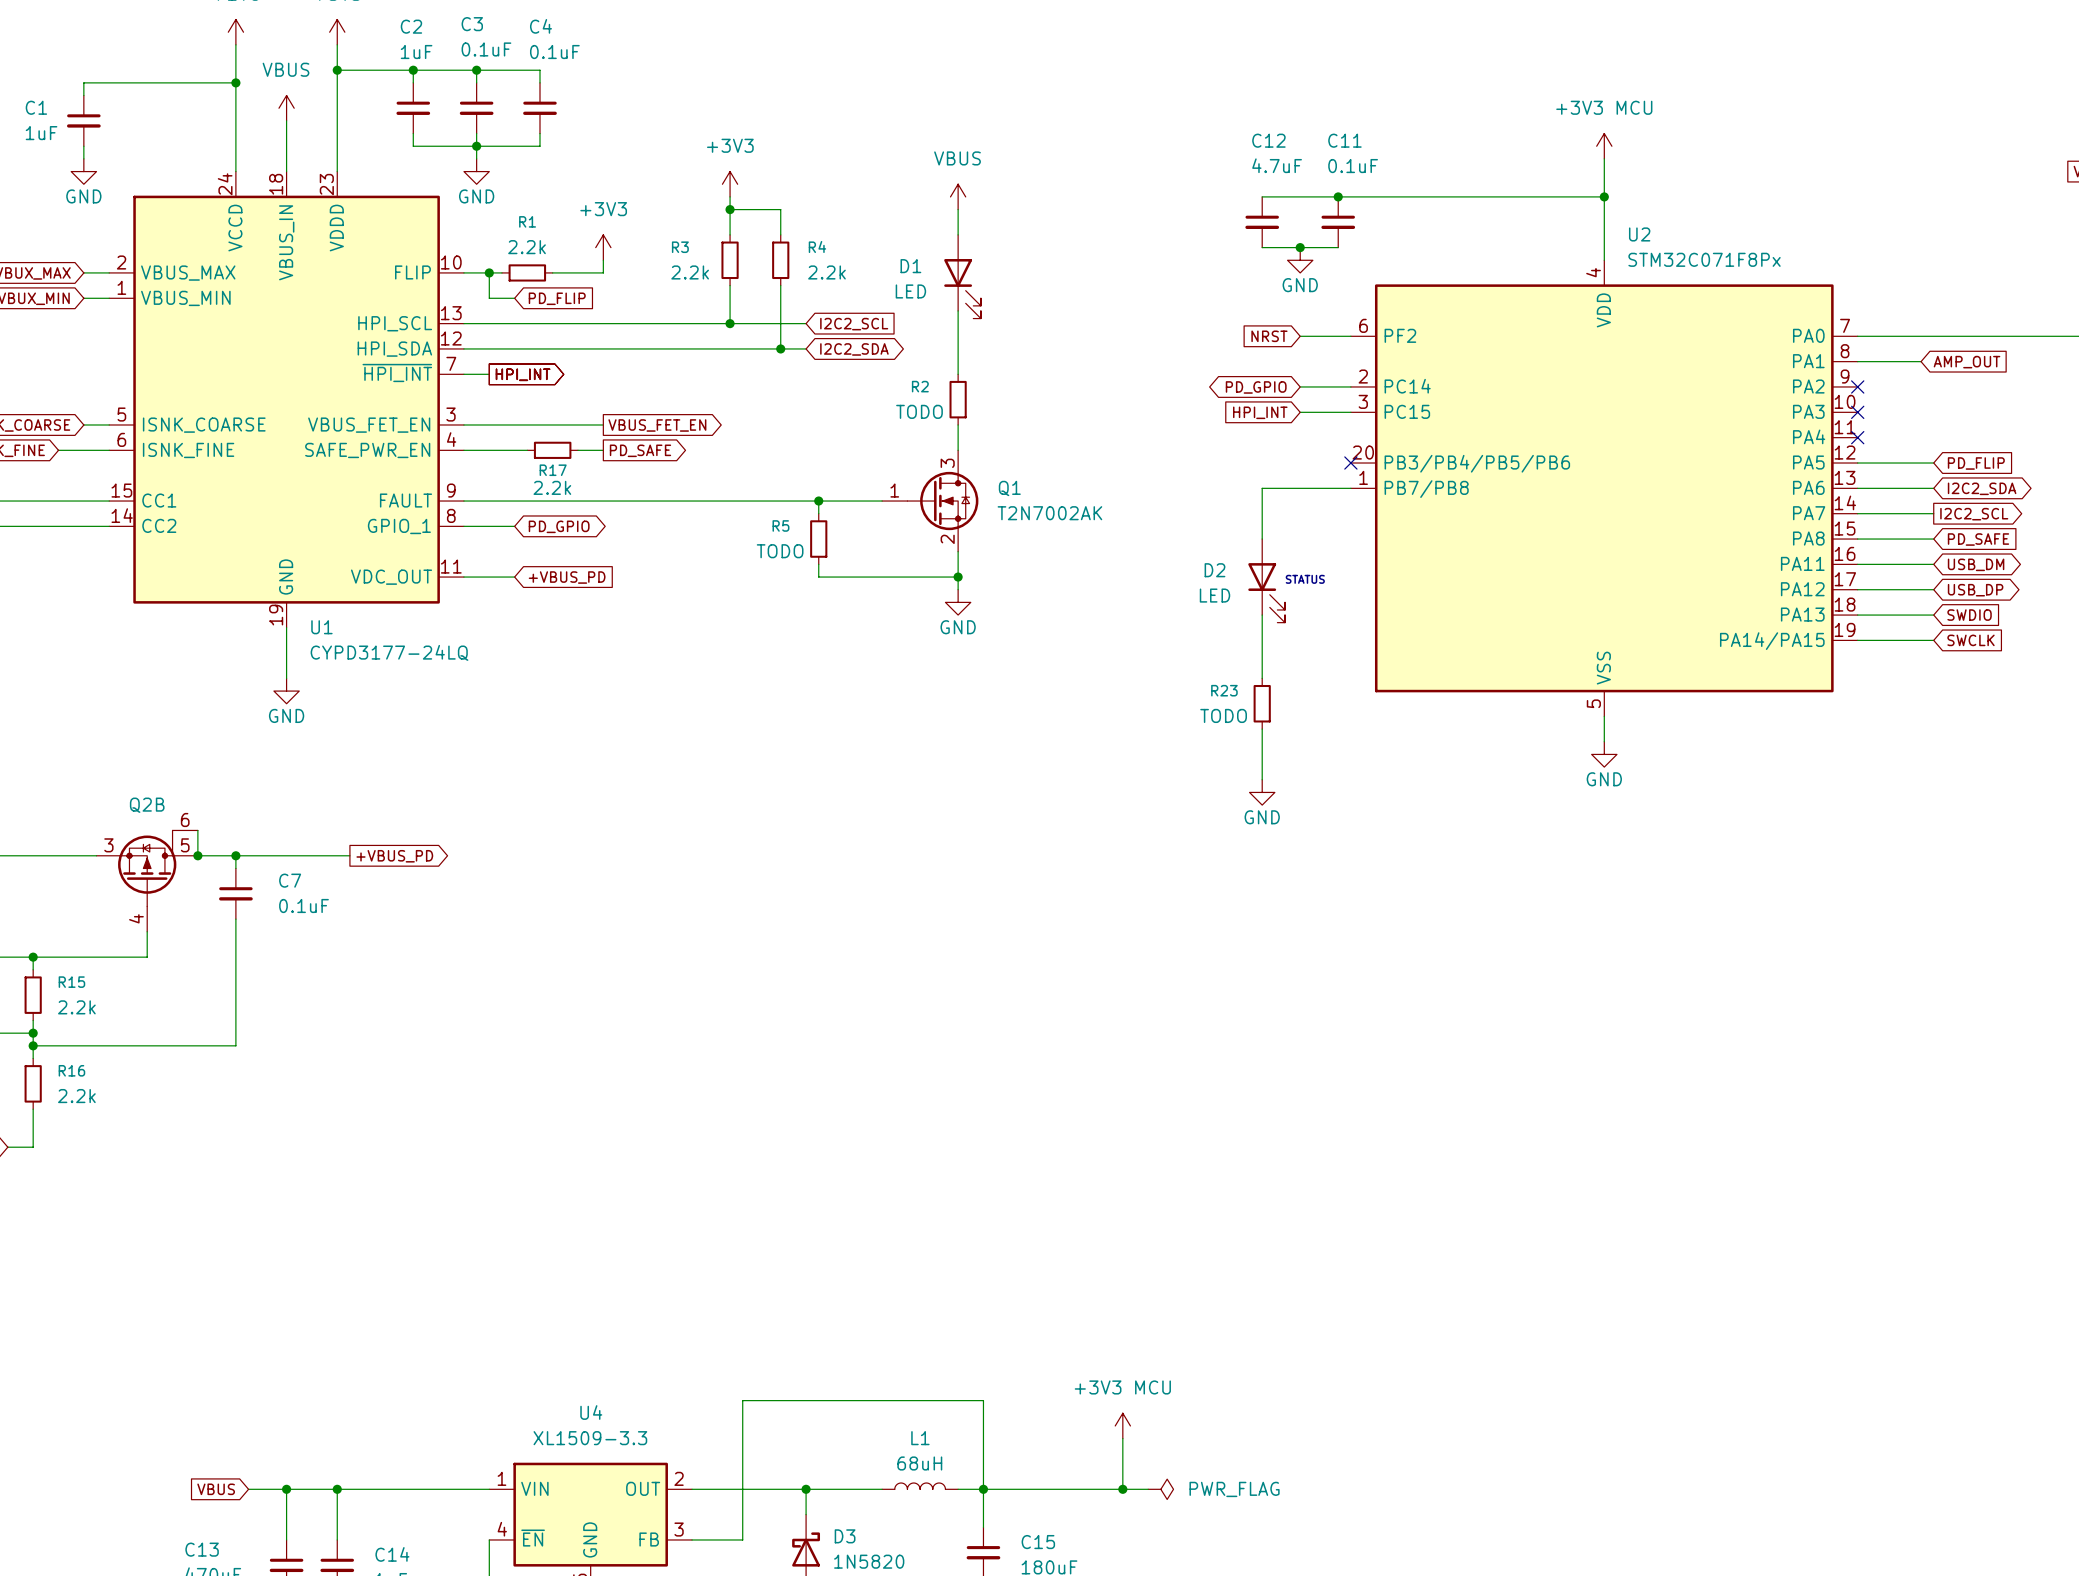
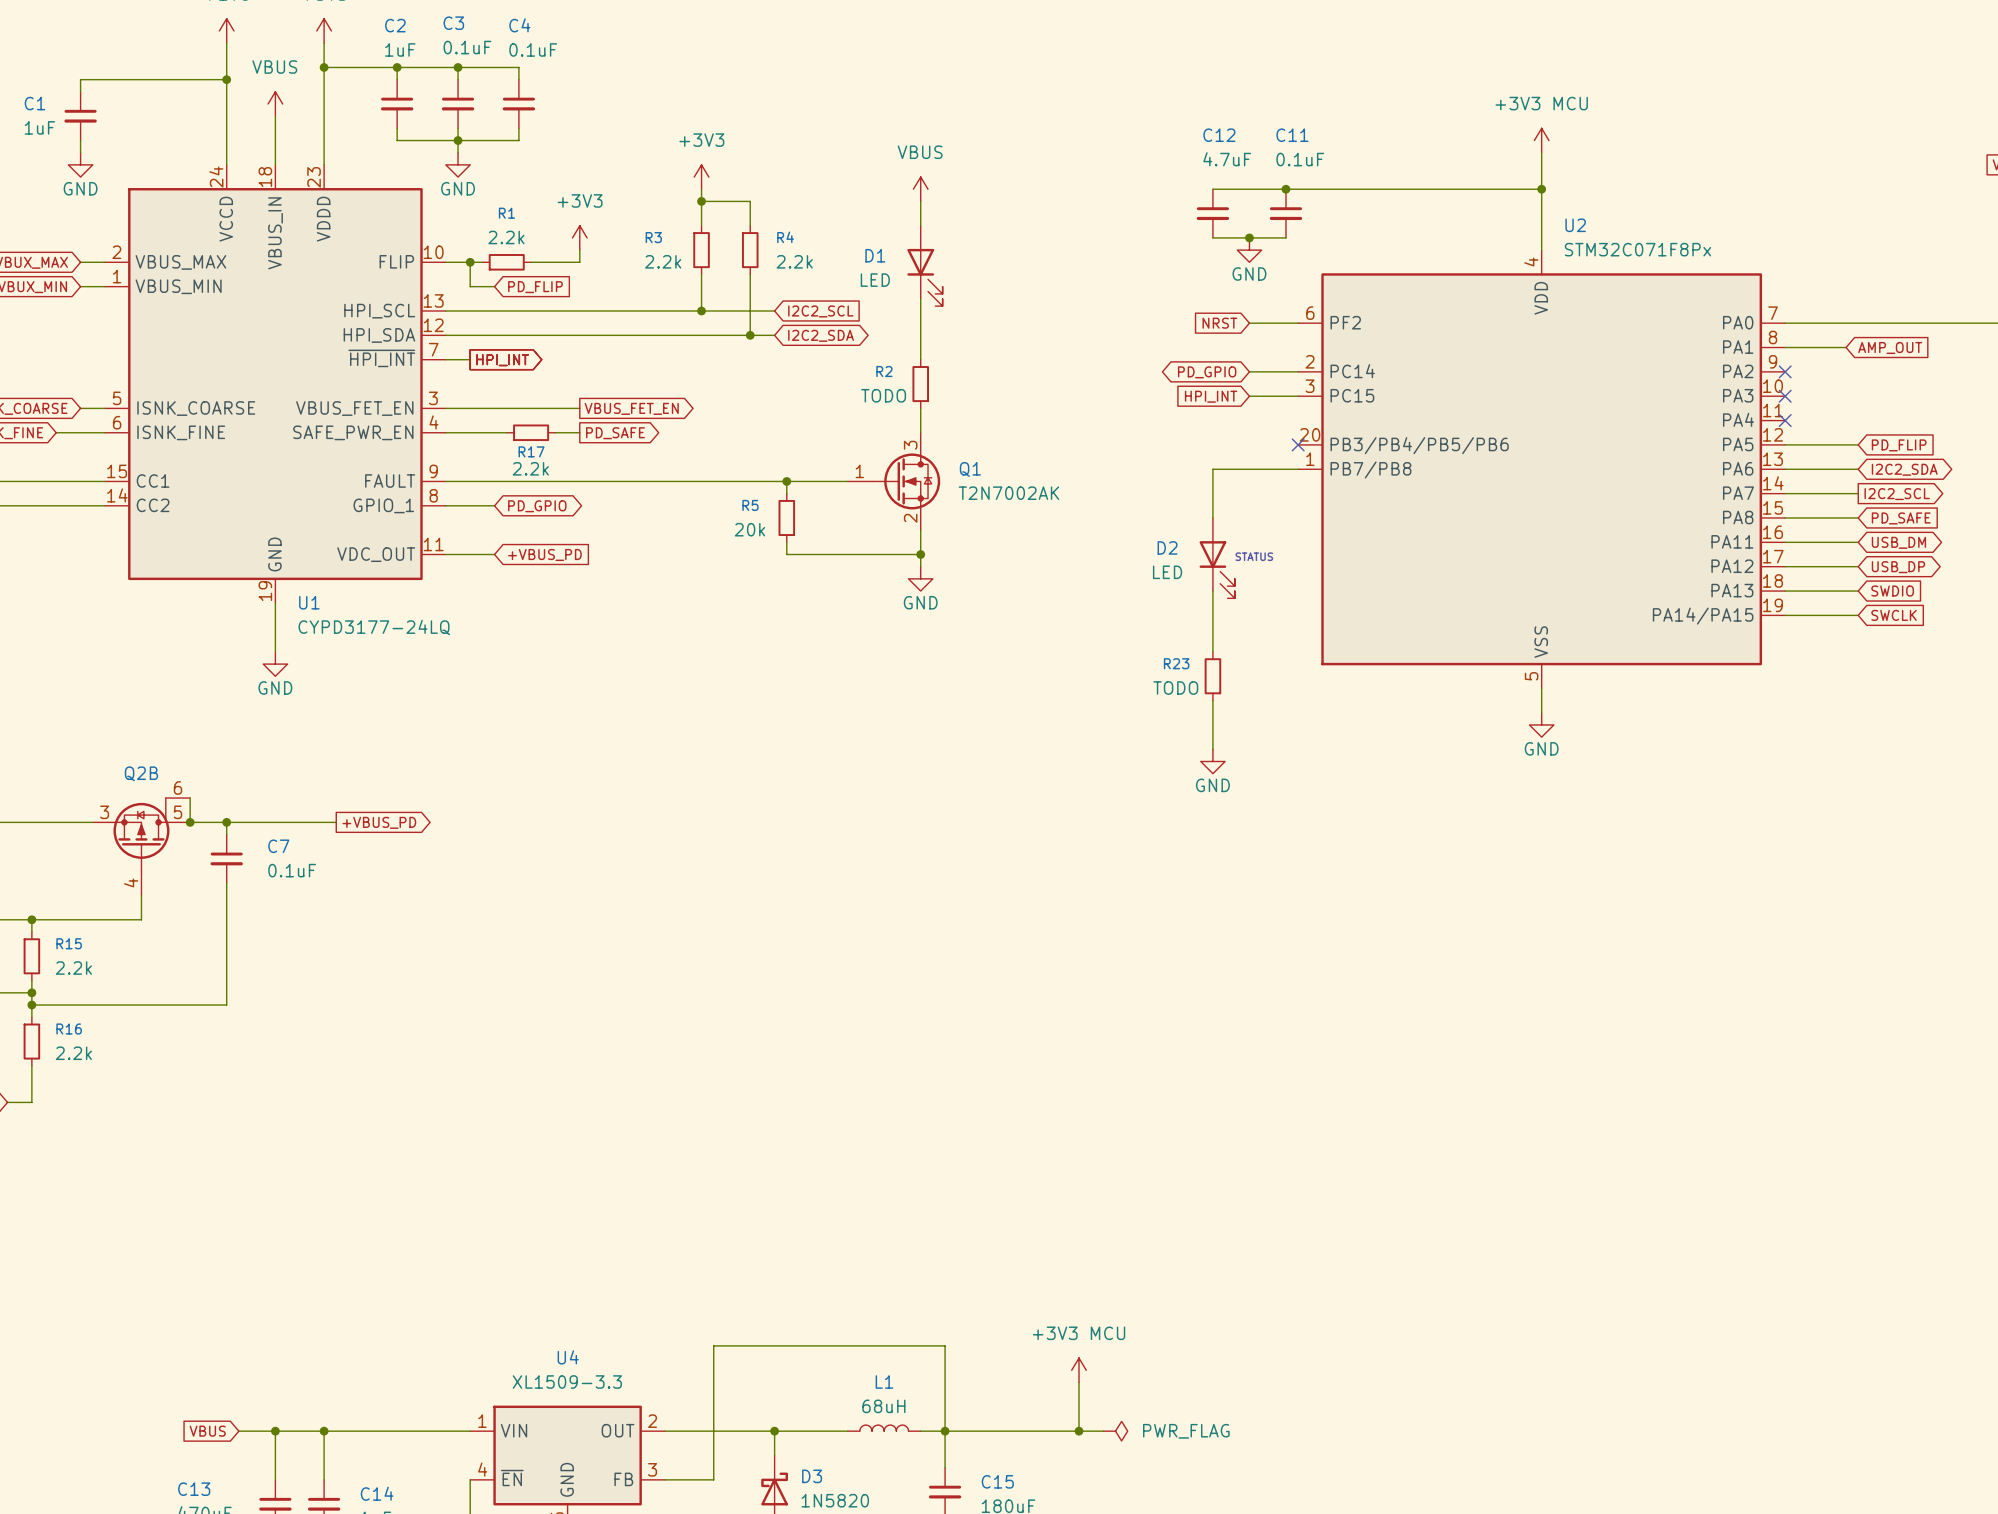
R5 value: TODO (780, 551) -> 20k (749, 529)

